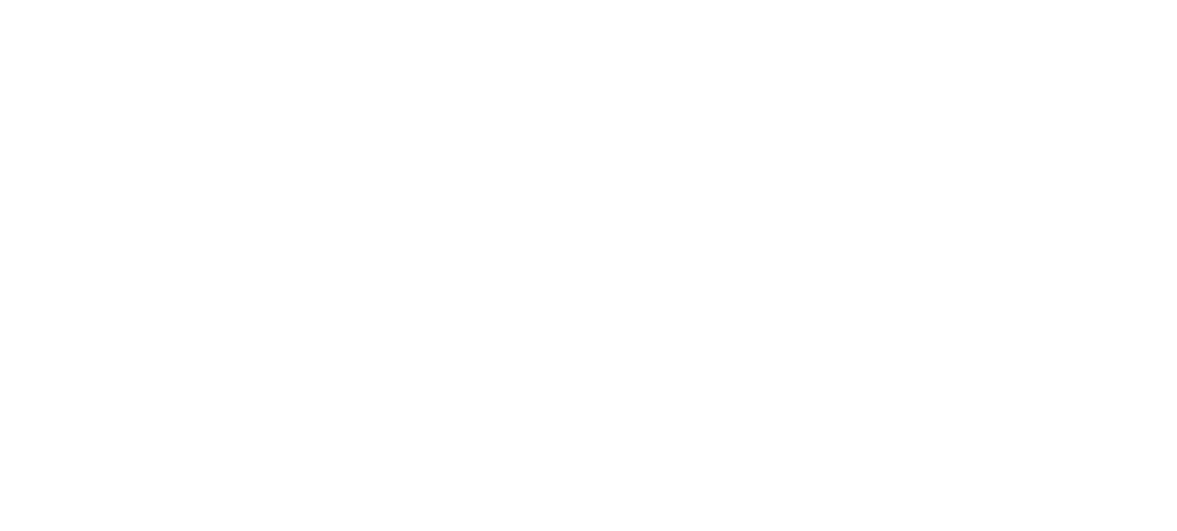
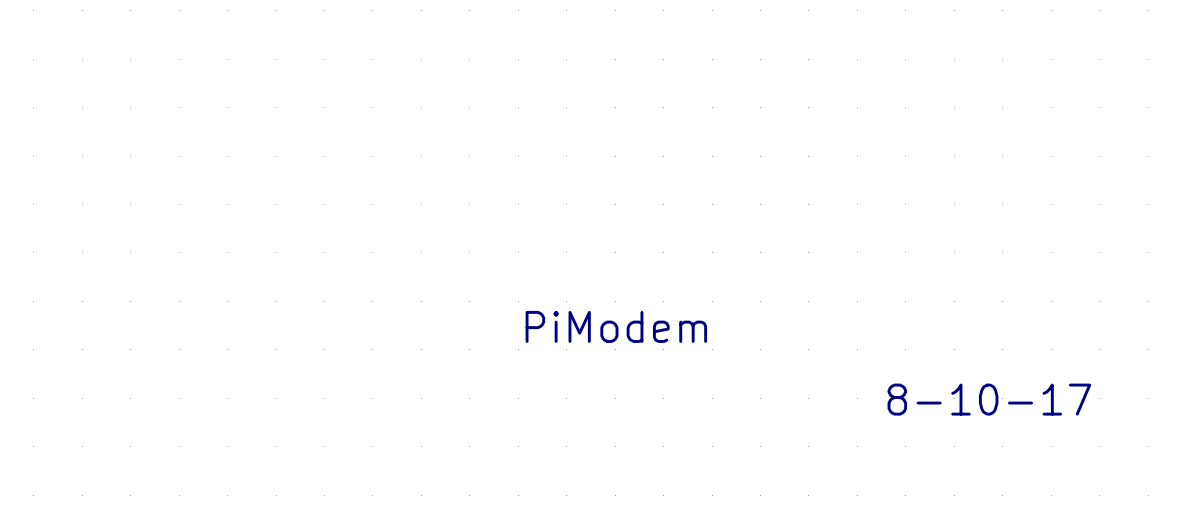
text: none -> PiModem (616, 326)
text: none -> 8-10-17 (989, 399)

